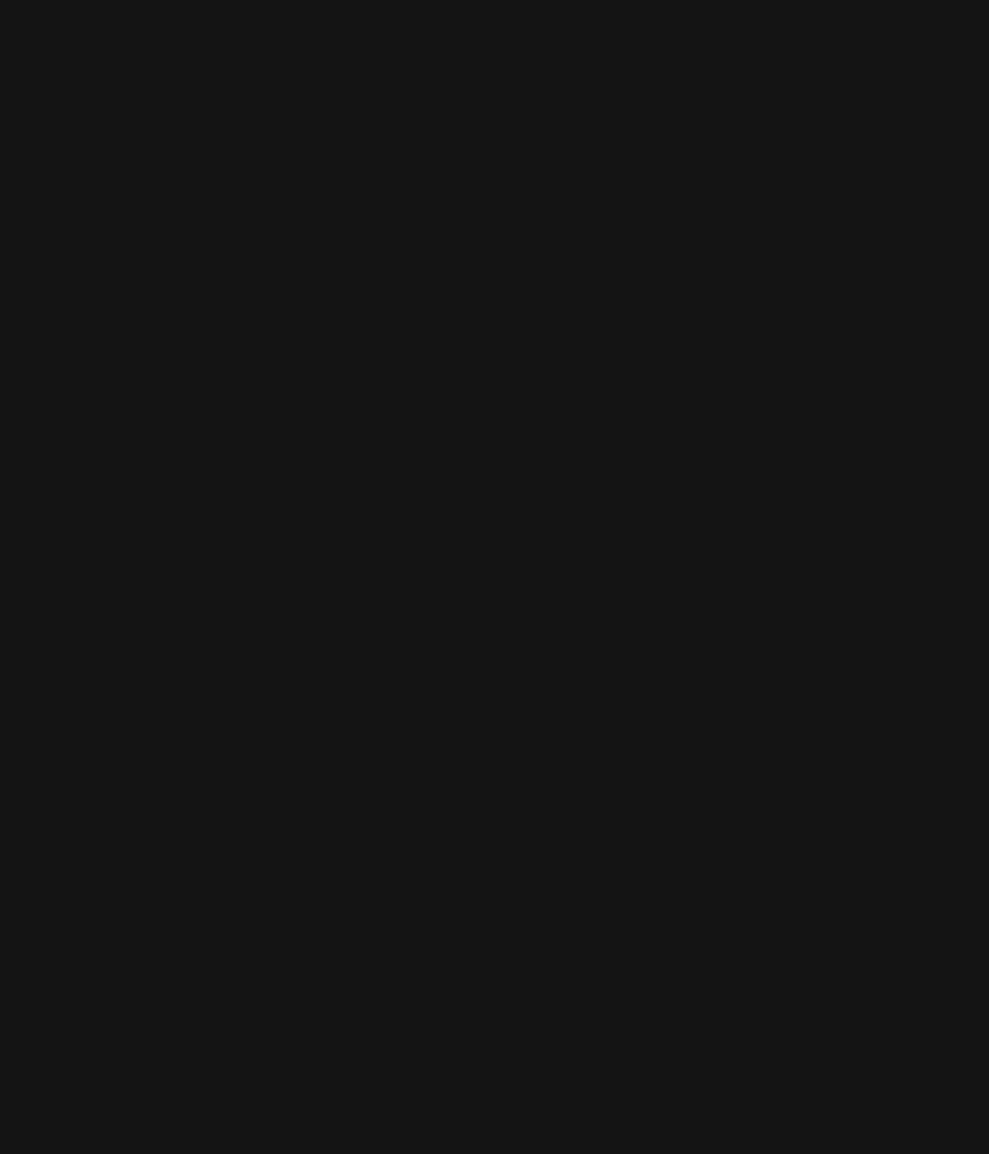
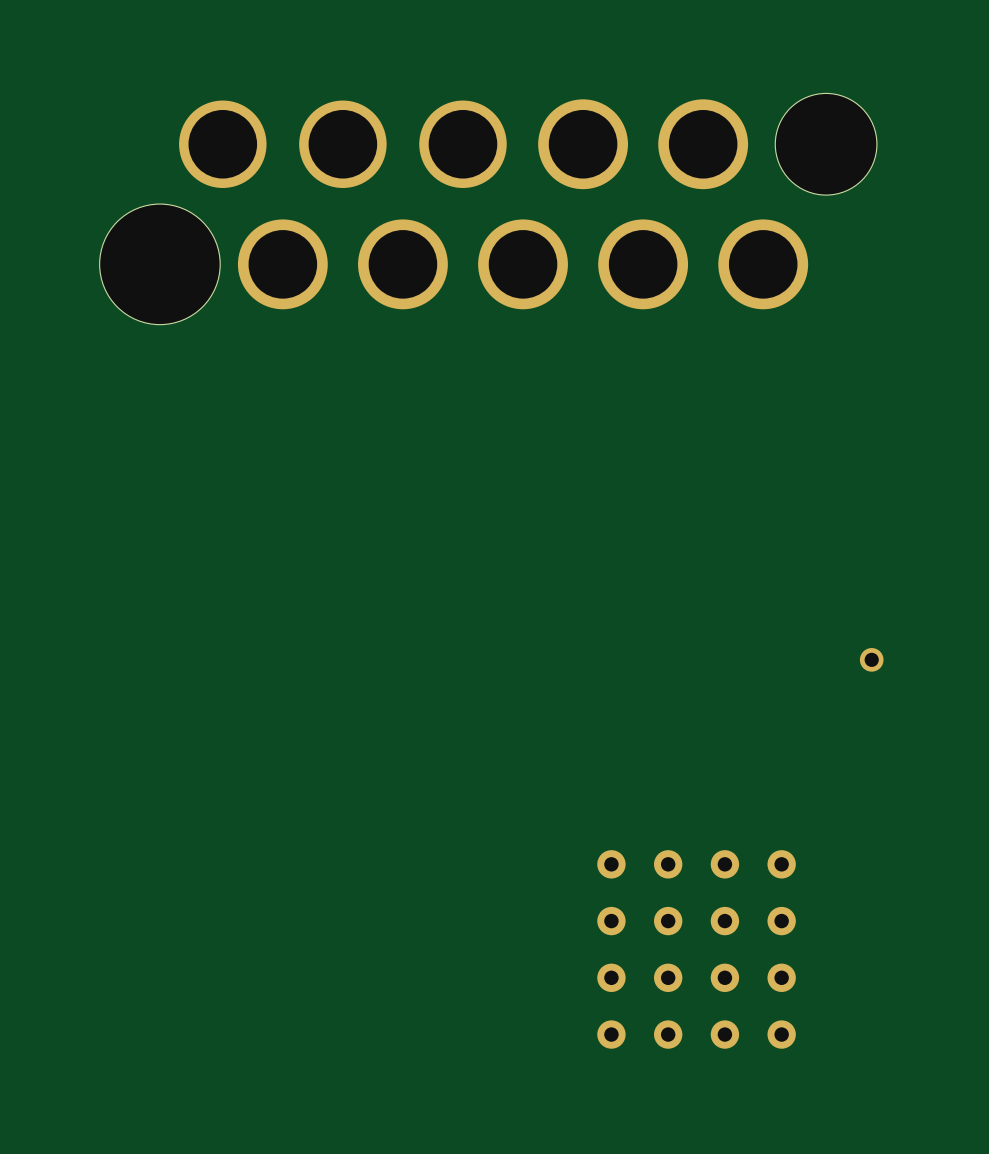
part: none -> (488, 209)
part: none -> (871, 659)
part: none -> (696, 949)

